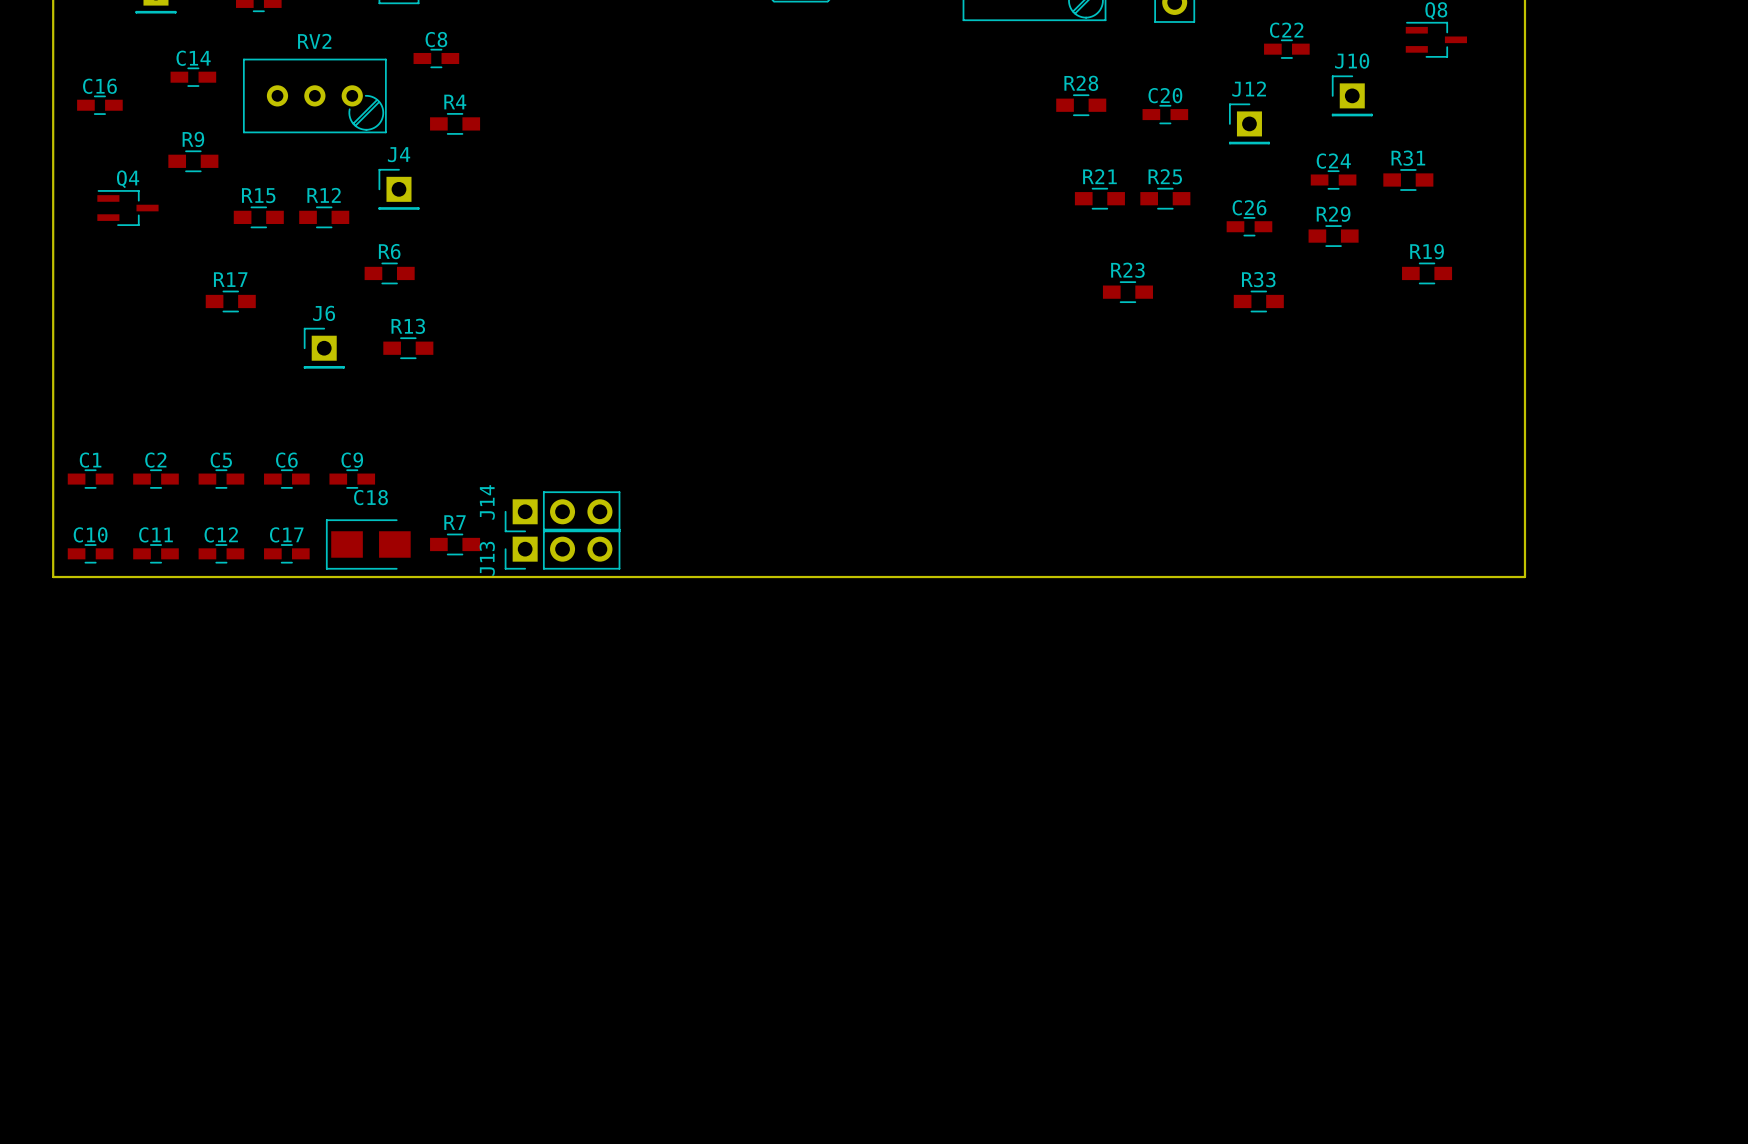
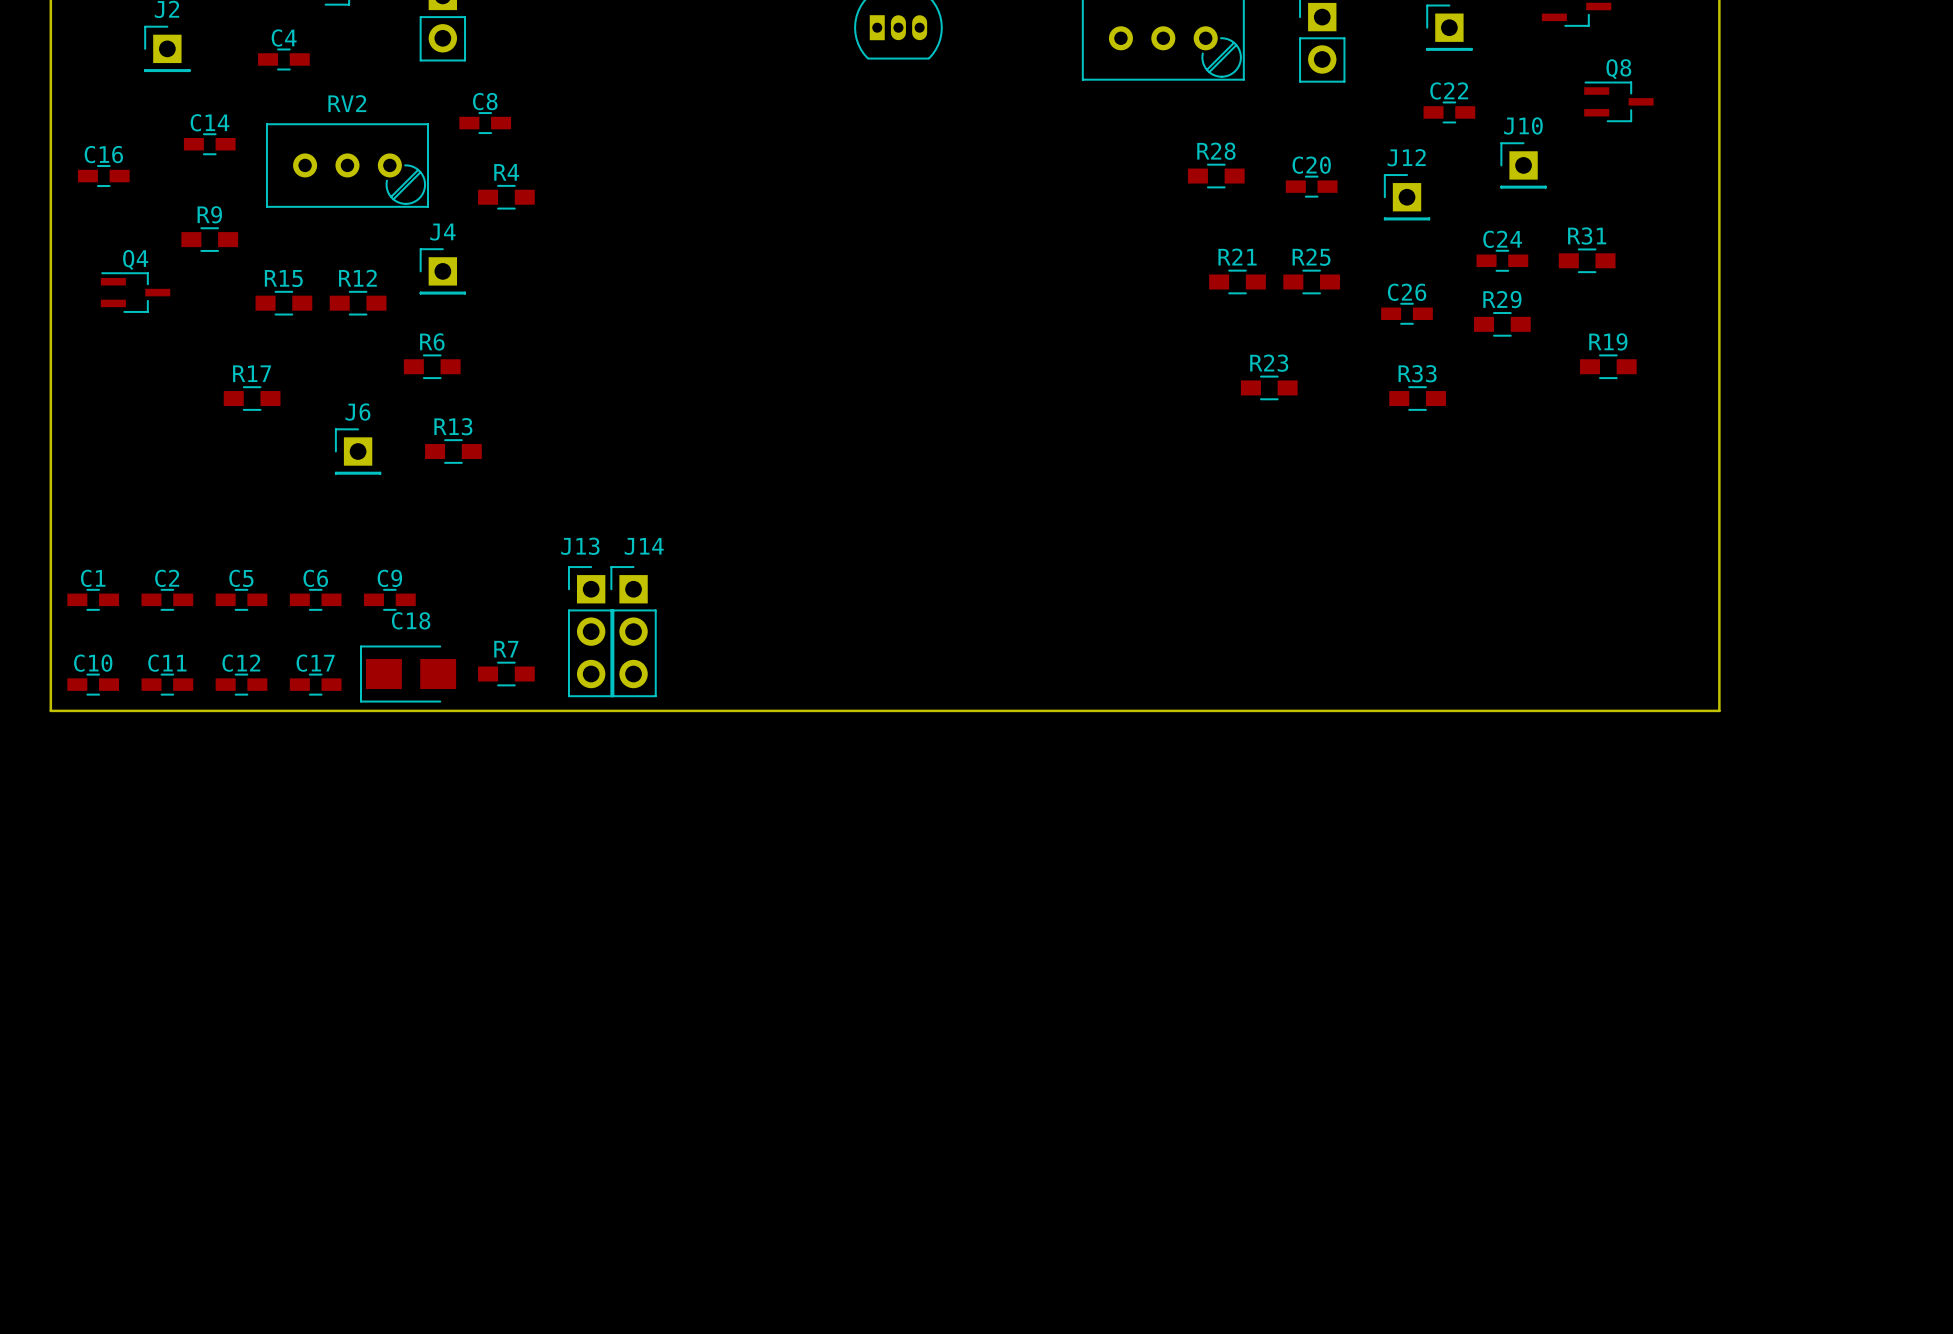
J14 rotation: 0° (562, 511) -> 90° clockwise (633, 631)
J13 rotation: 0° (562, 549) -> 90° clockwise (591, 631)

